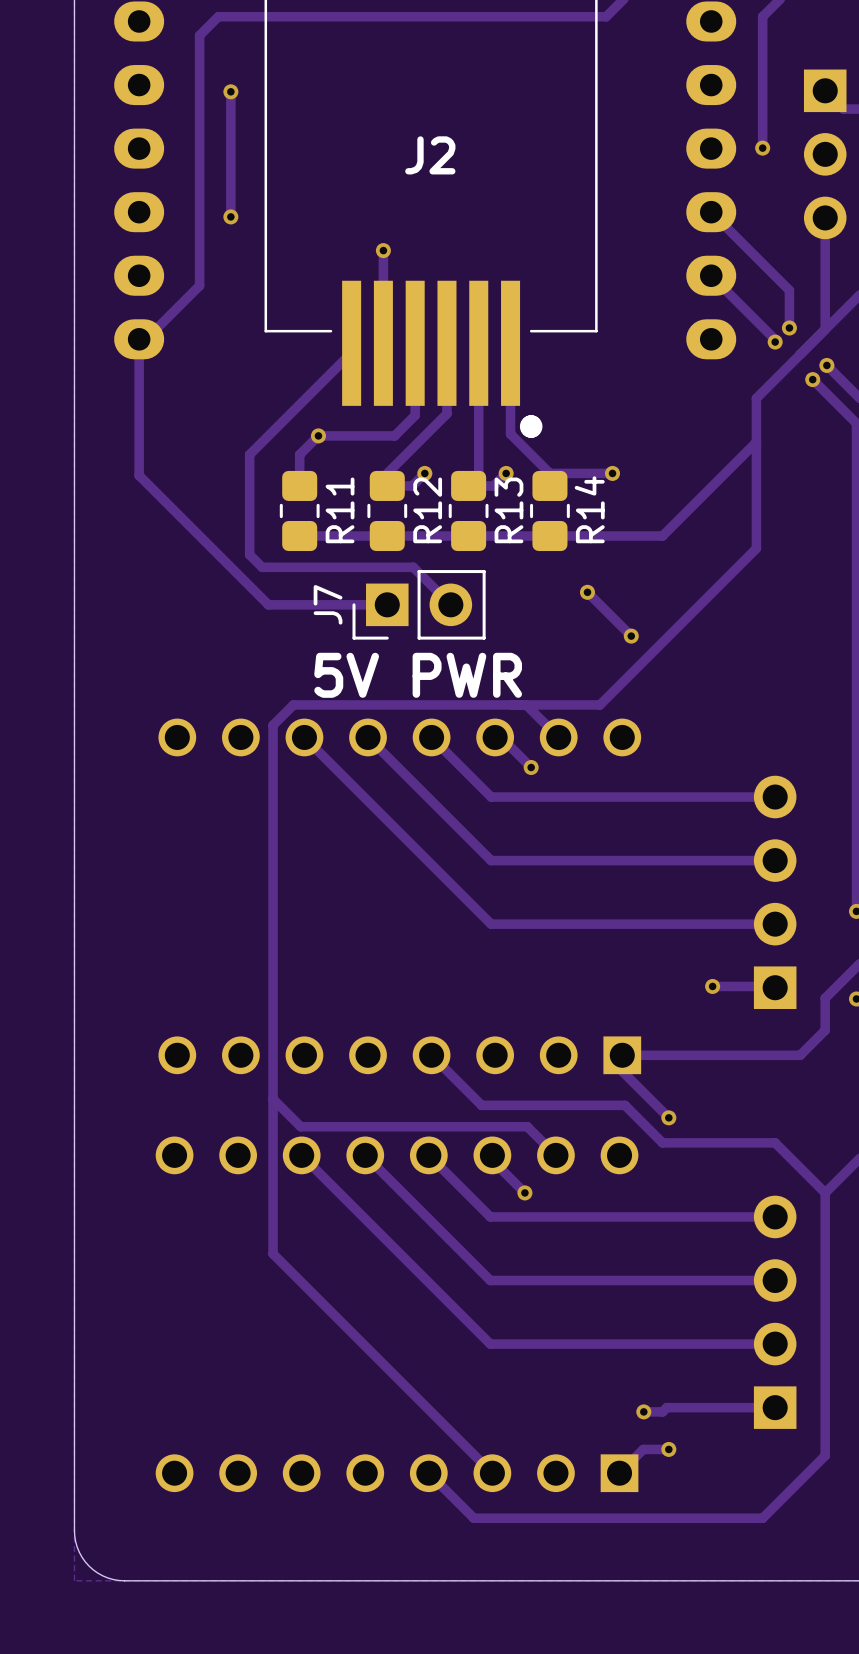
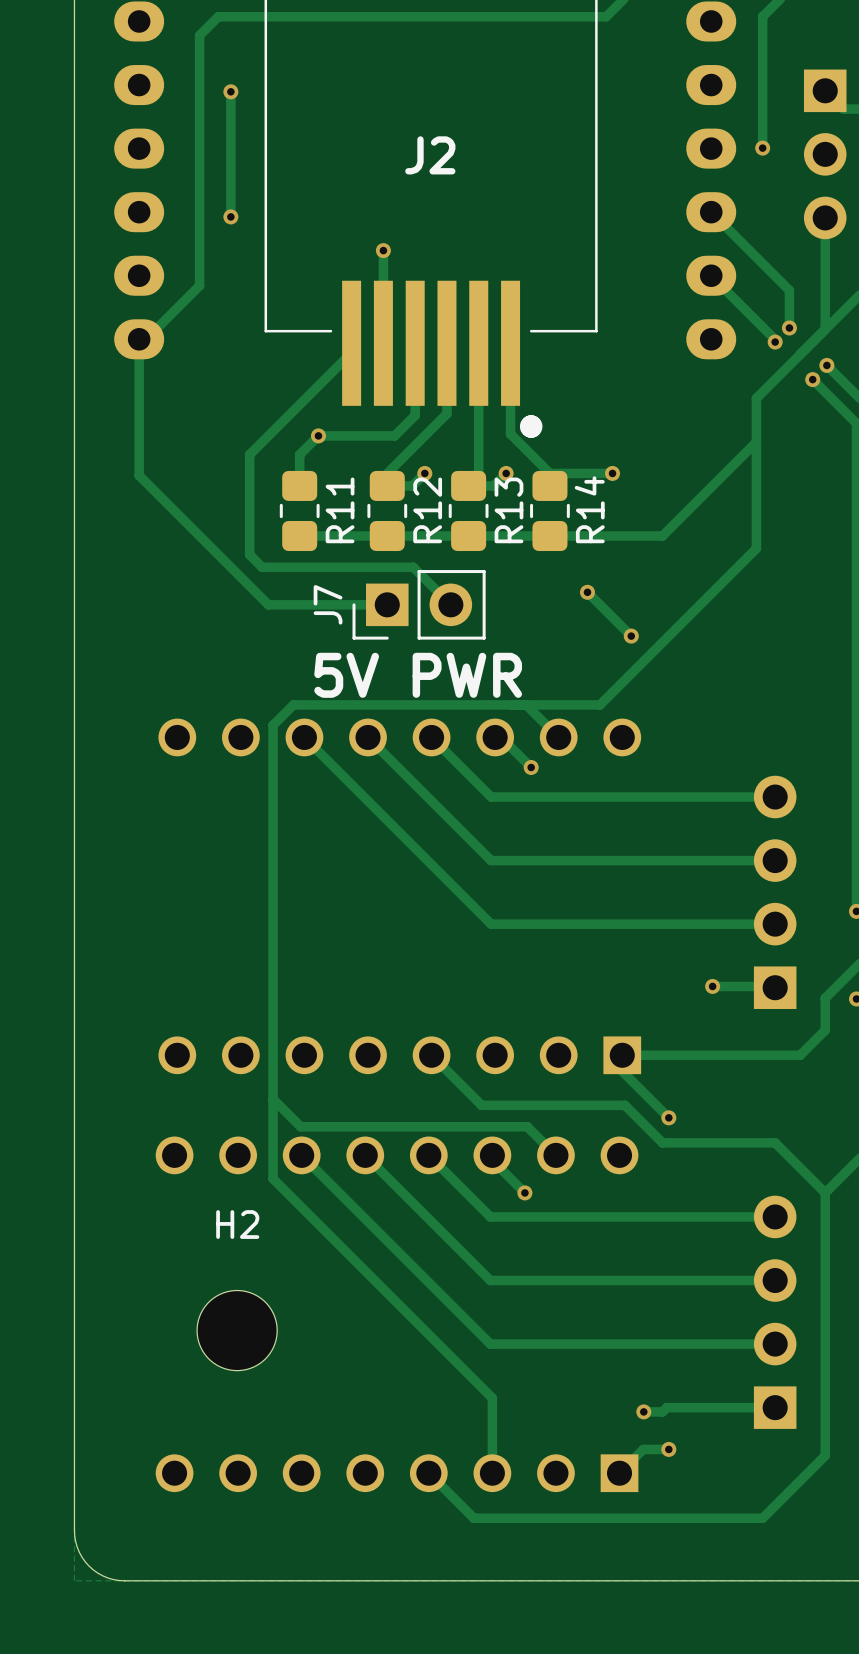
track: (273, 1178) (273, 1253) (492, 1473) -> (273, 1178) (492, 1398) (492, 1473)
H2: none -> (237, 1330)

